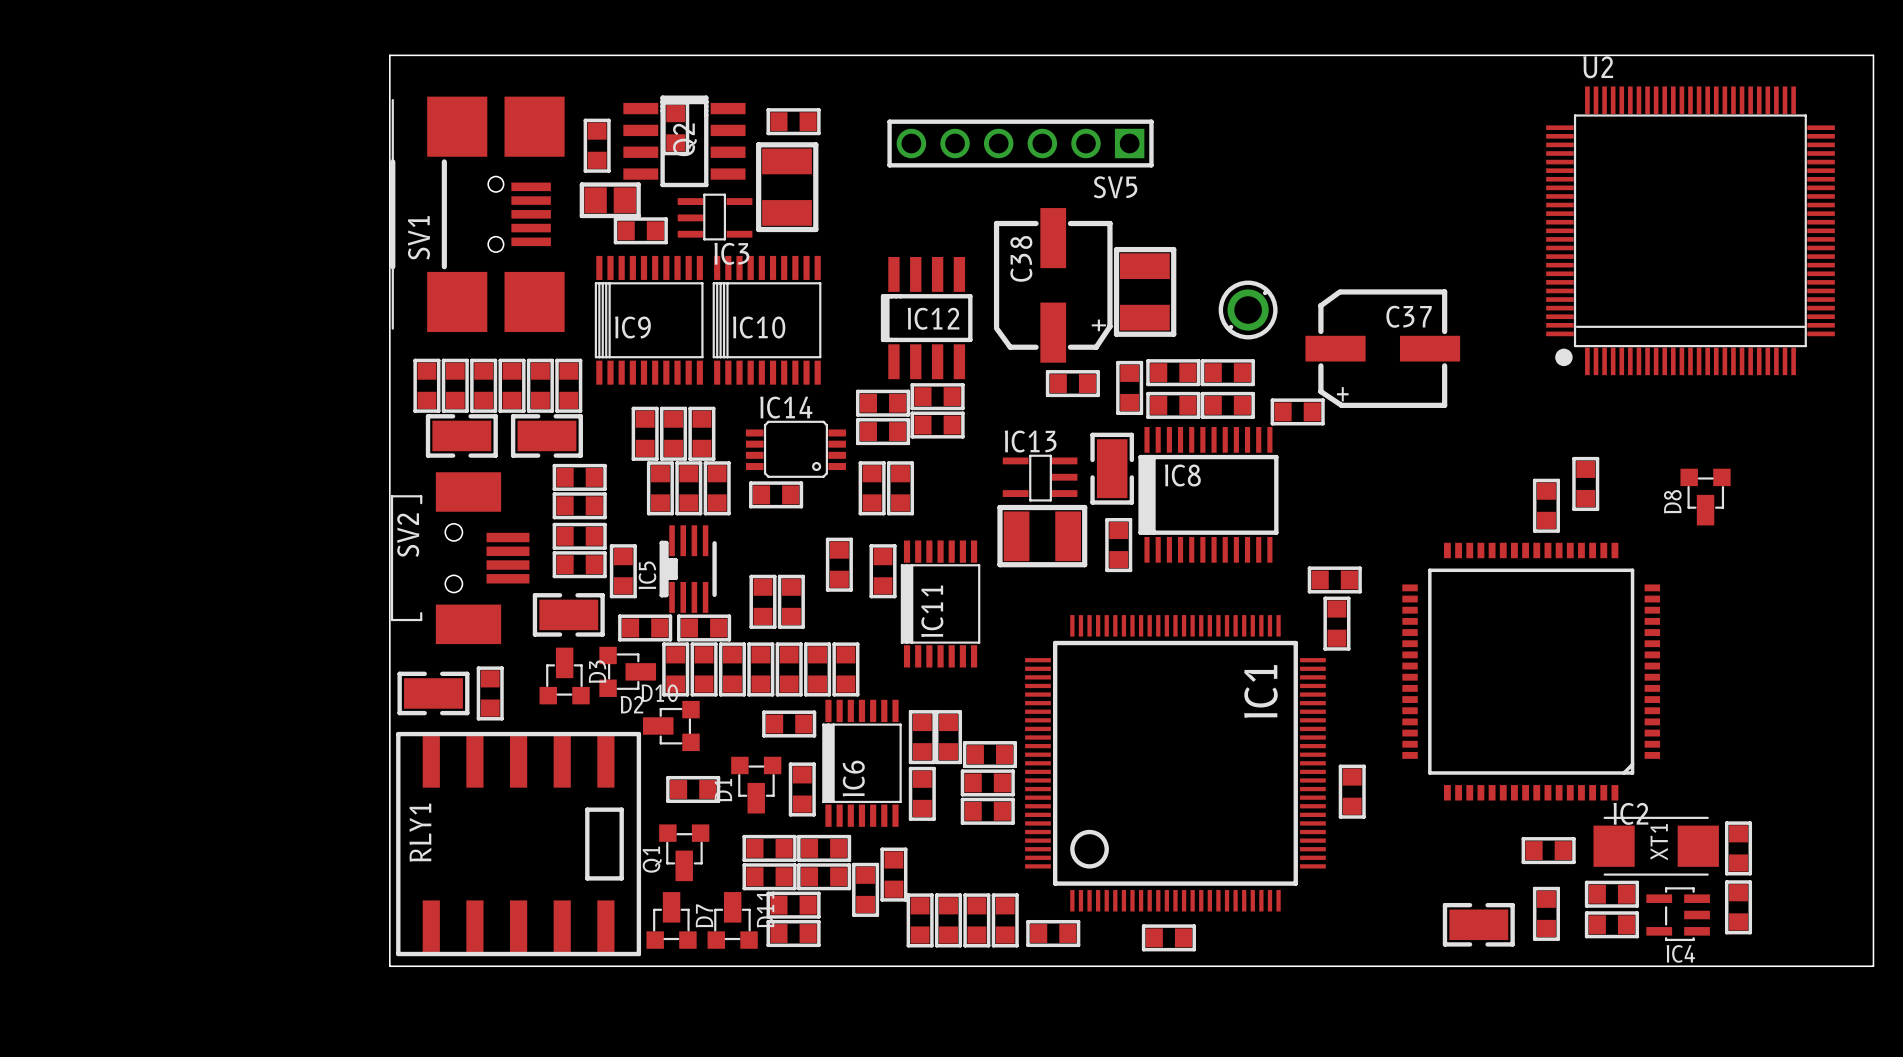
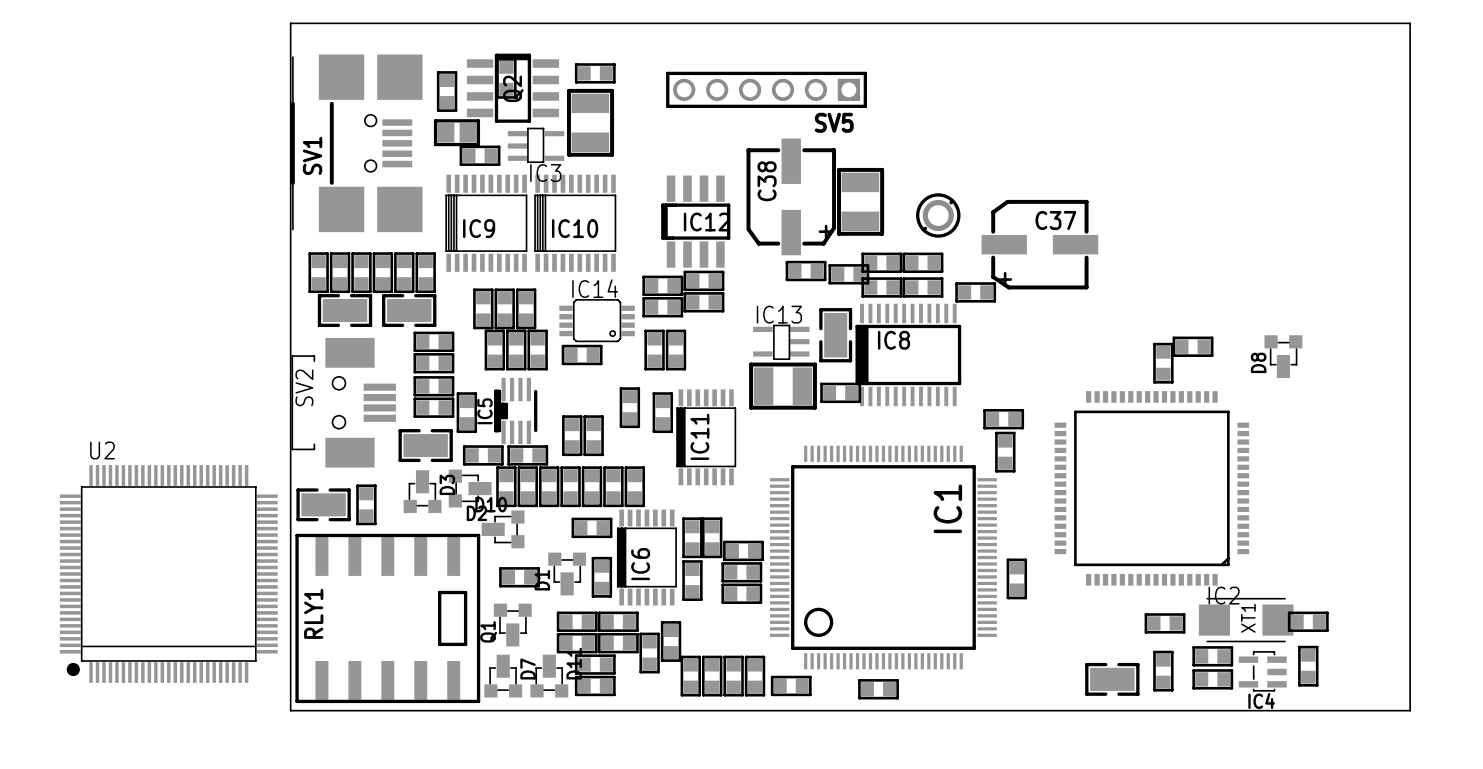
U2 position: (1690, 230) -> (168, 573)
part rotation: 0° (1129, 387) -> 90° clockwise (848, 274)
part rotation: 0° (1585, 483) -> 90° clockwise (1193, 346)
part rotation: 0° (1118, 545) -> 90° clockwise (840, 392)
part rotation: 0° (1738, 848) -> 90° clockwise (1308, 621)

